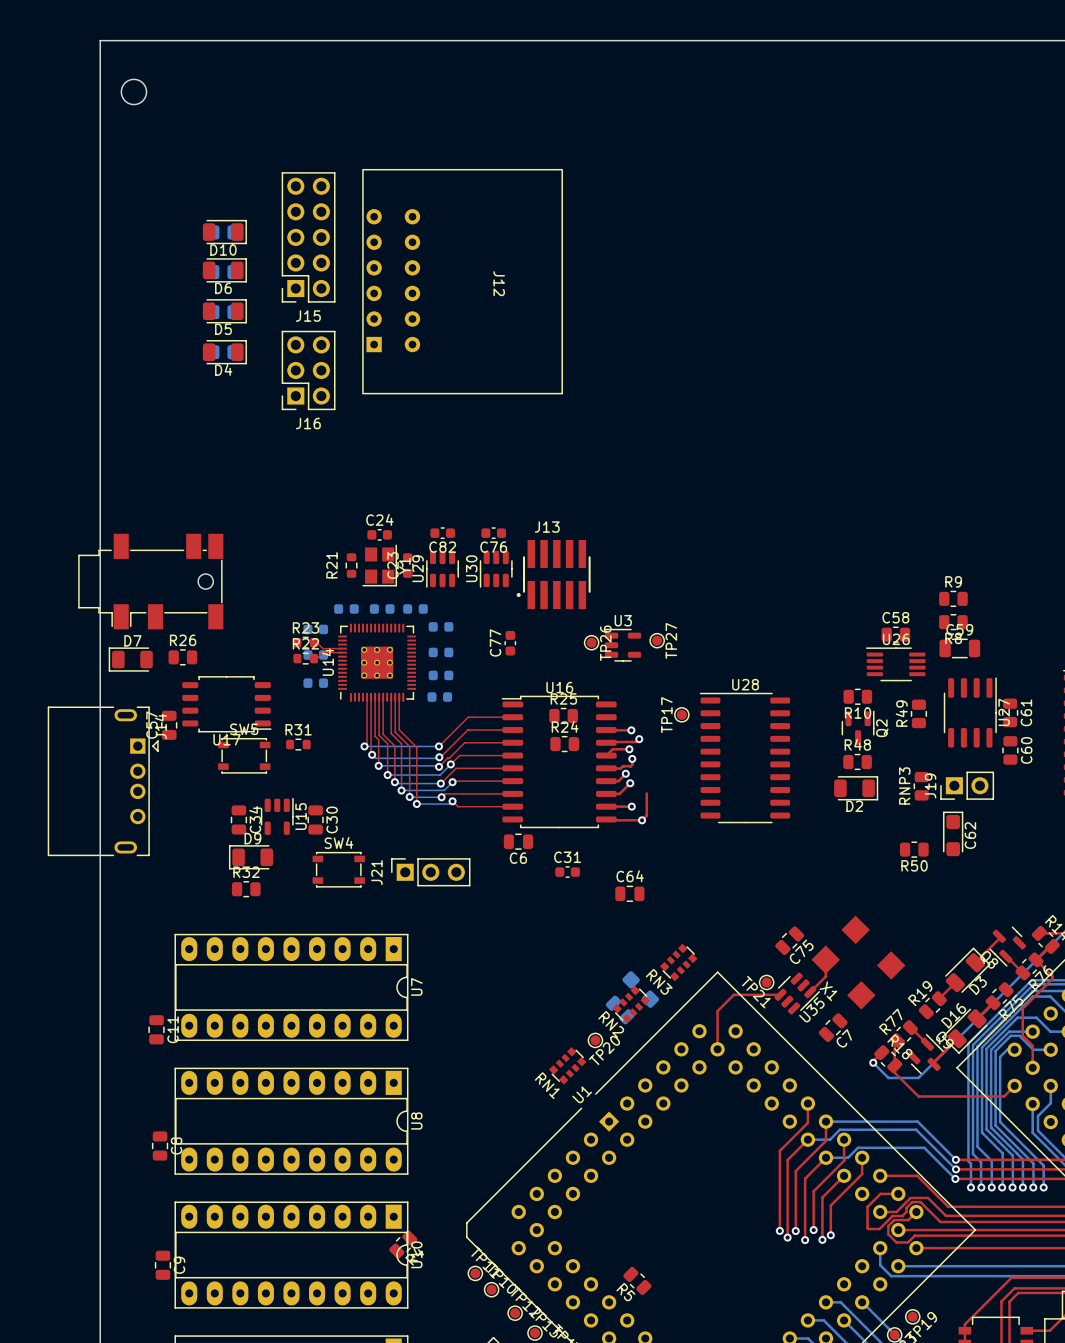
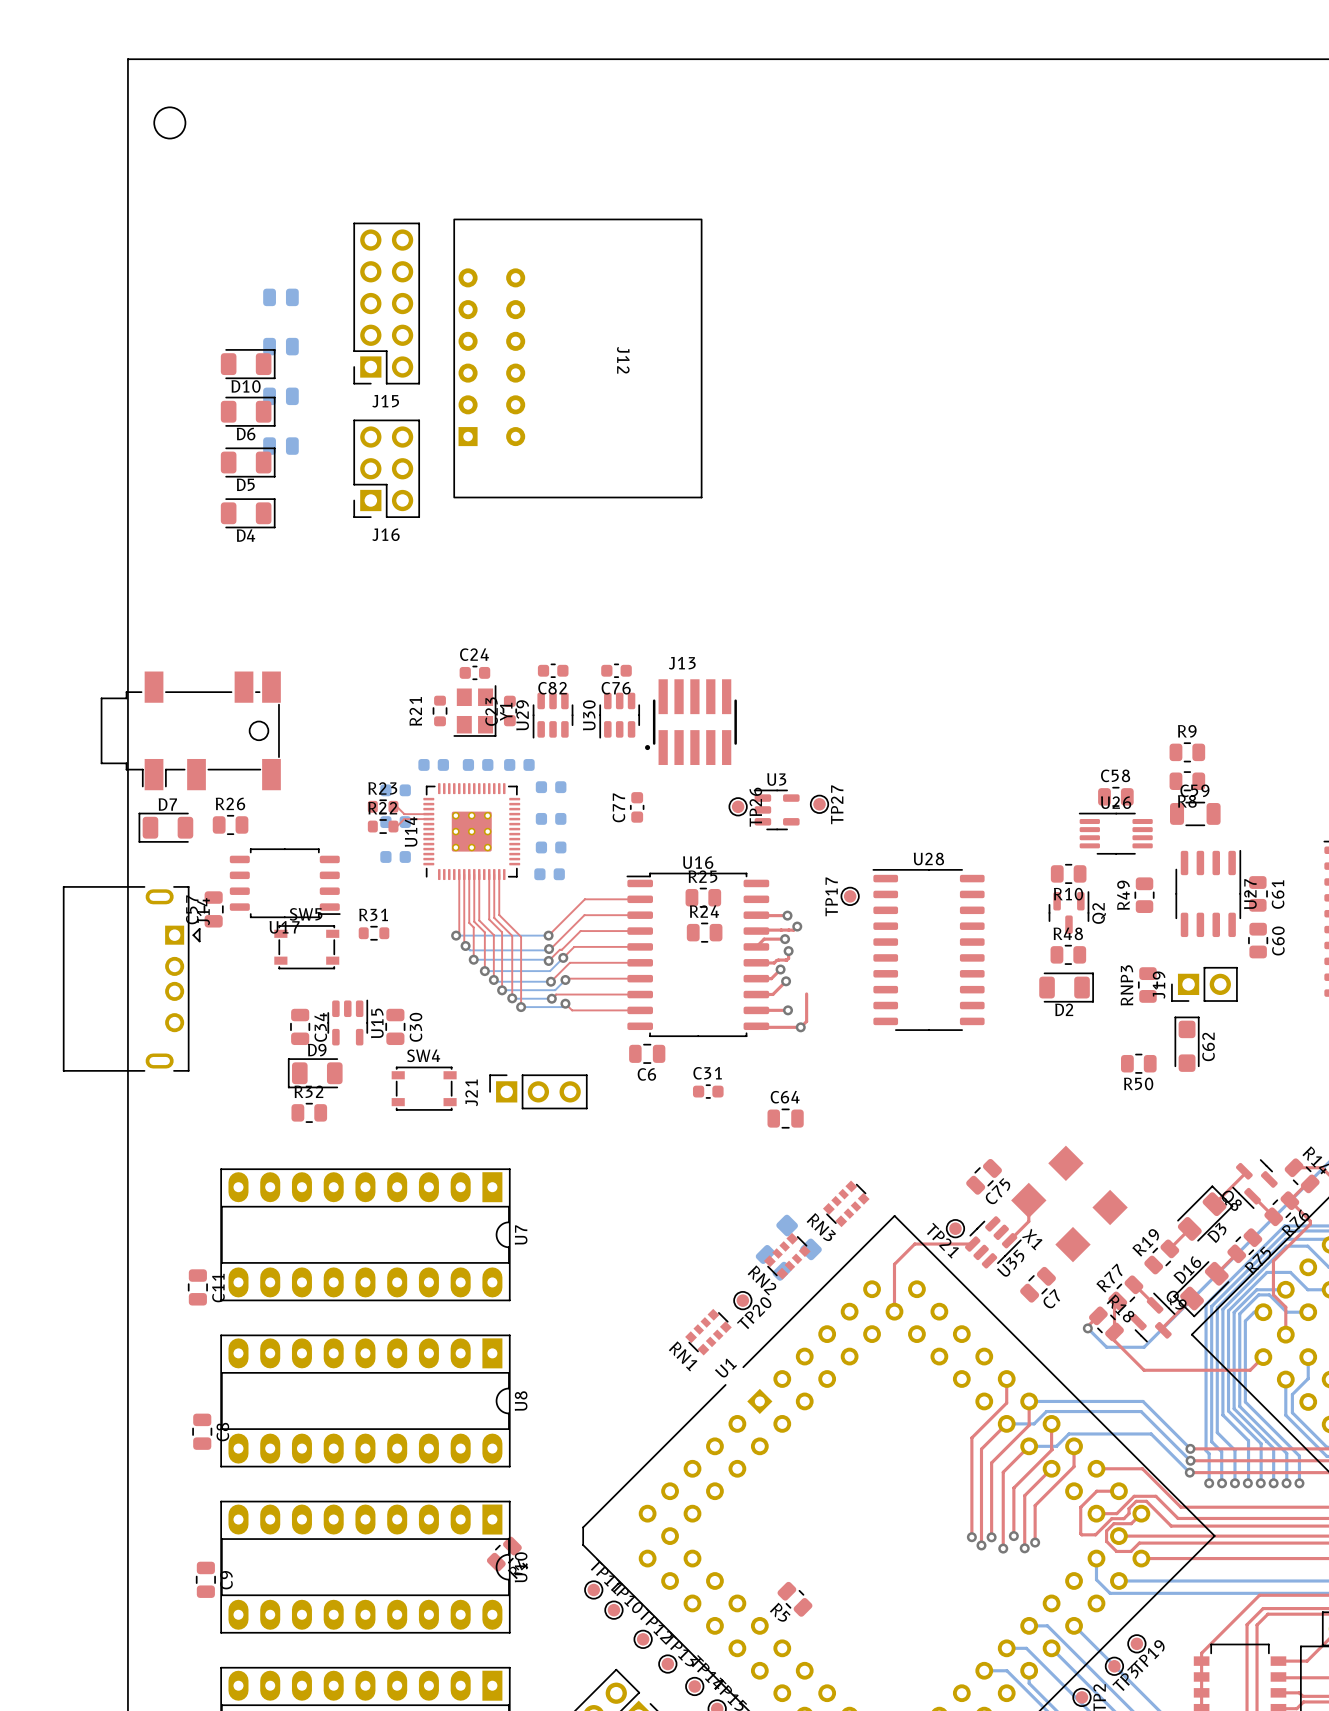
D10 position: (224, 232) -> (248, 364)
D6 position: (224, 270) -> (248, 411)
D5 position: (224, 311) -> (248, 462)
D4 position: (224, 352) -> (248, 513)

